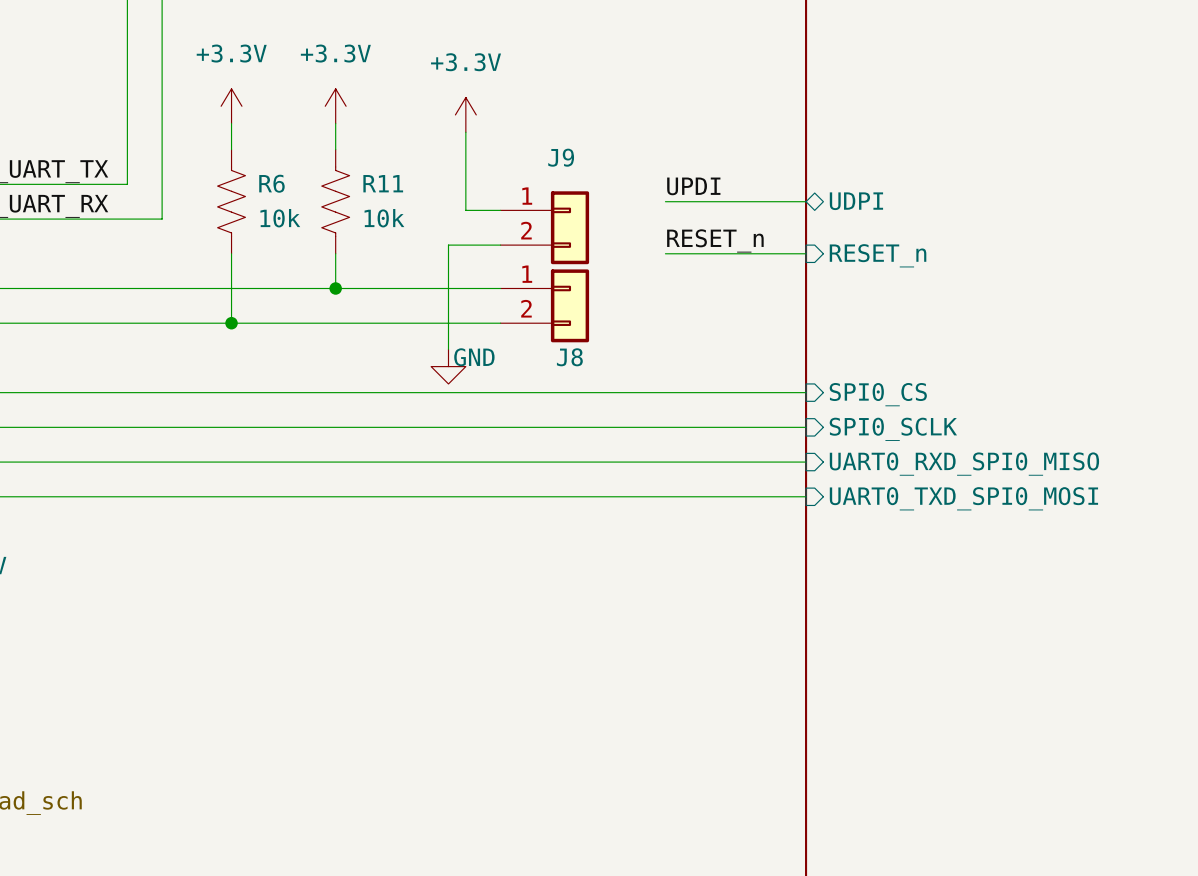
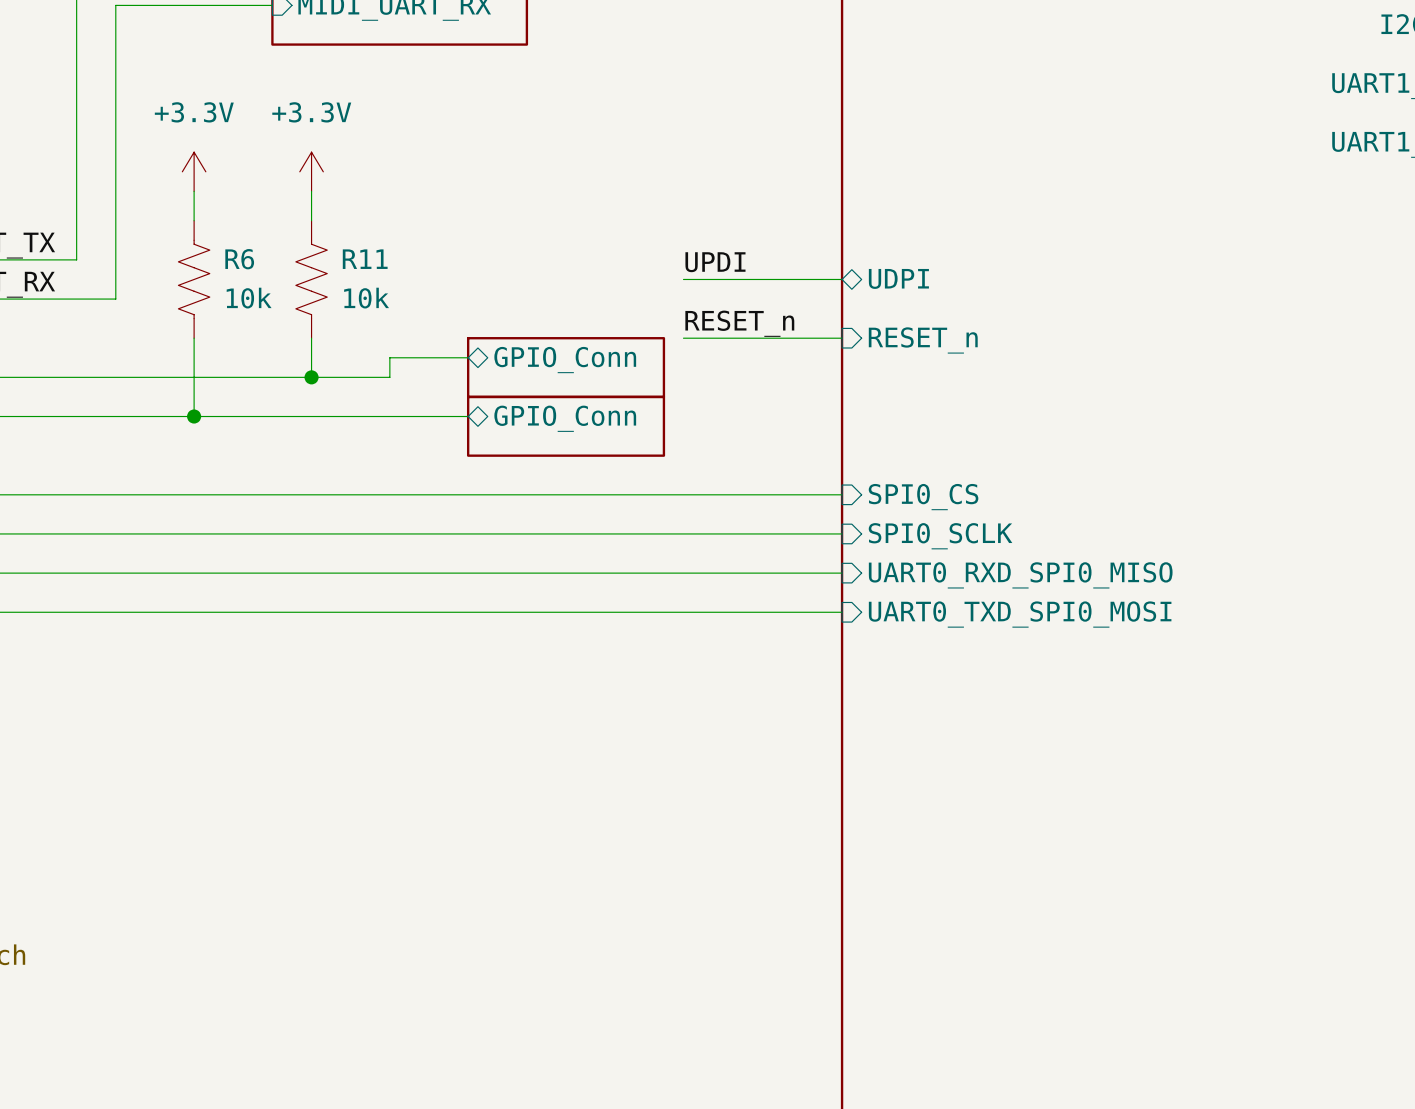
power symbol: +3.3V (465, 114) -> none
wire: (465, 132) (465, 210) (500, 210) -> none
J9: (544, 227) -> none
wire: (500, 245) (448, 245) (448, 349) -> none
sheet pin: none -> GPIO_Conn (565, 360)
sheet: none -> (566, 367)
wire: (405, 288) (500, 288) -> (389, 377) (389, 357) (468, 357)
J8: (544, 305) -> none
wire: (474, 323) (500, 323) -> none
sheet pin: none -> GPIO_Conn (565, 418)
sheet: none -> (566, 426)
power symbol: GND (448, 366) -> none

